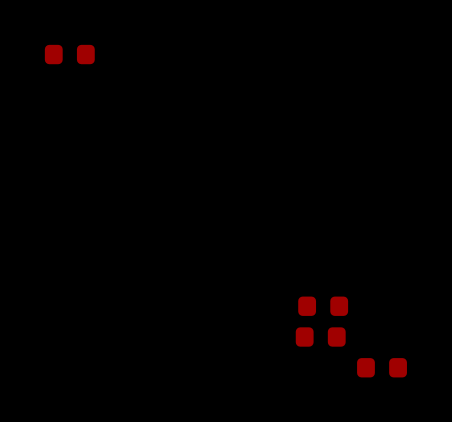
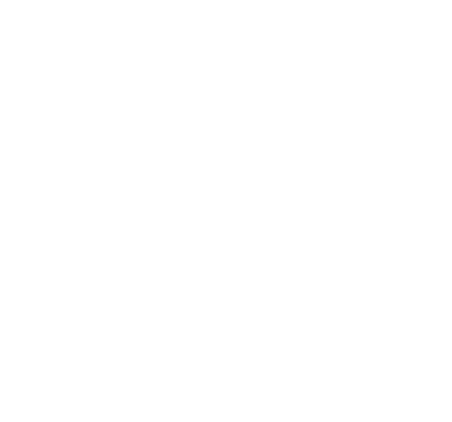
part: (69, 54) -> none
part: (323, 306) -> none
part: (320, 337) -> none
part: (382, 367) -> none

